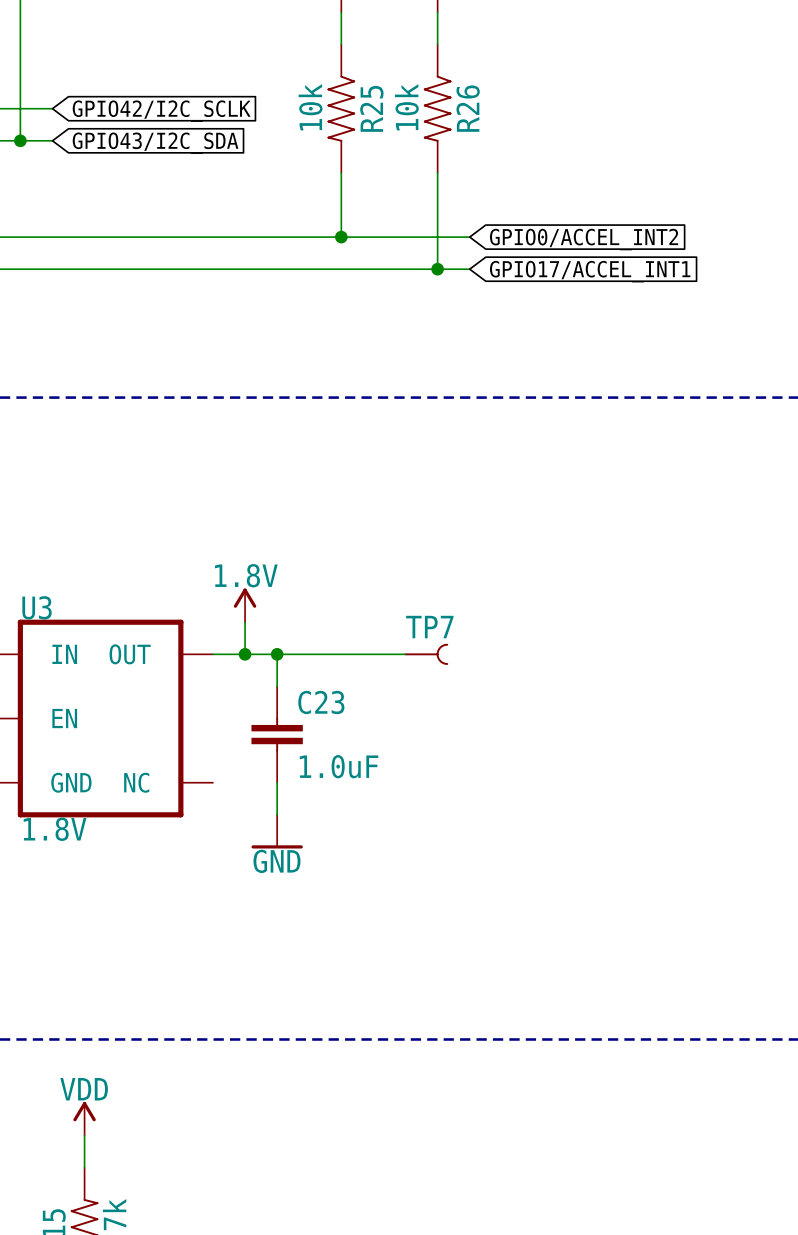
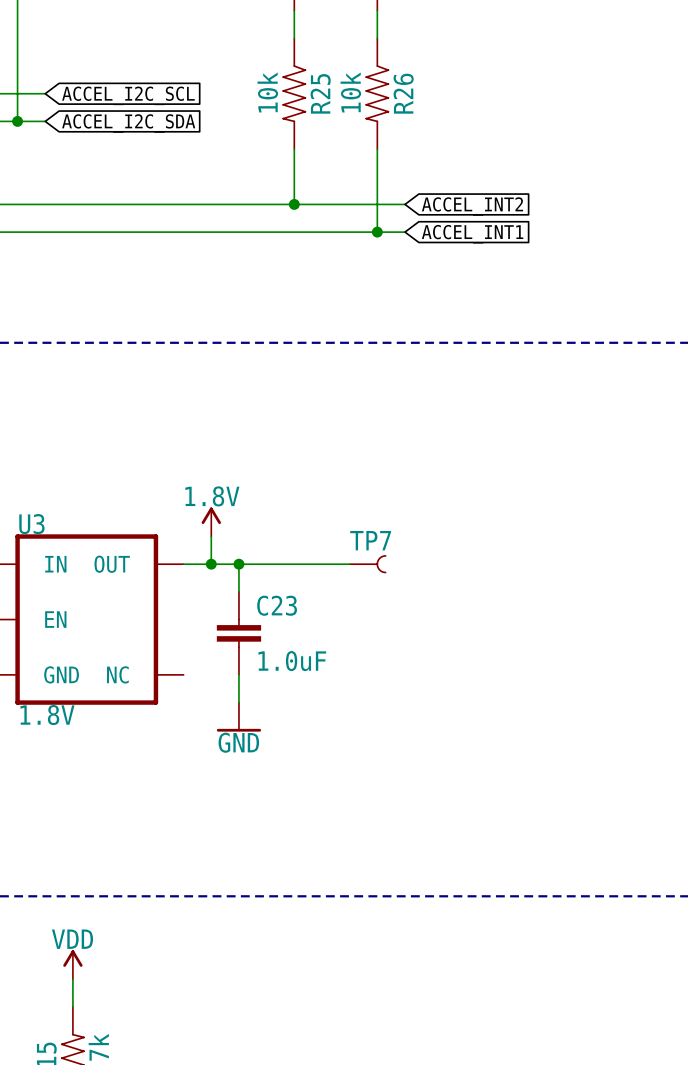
global label: GPIO42/I2C_SCLK (161, 111) -> ACCEL_I2C_SCL (128, 95)
global label: GPIO43/I2C_SDA (155, 143) -> ACCEL_I2C_SDA (128, 123)
global label: GPIO0/ACCEL_INT2 (584, 239) -> ACCEL_INT2 (472, 206)
global label: GPIO17/ACCEL_INT1 (590, 271) -> ACCEL_INT1 (472, 234)

